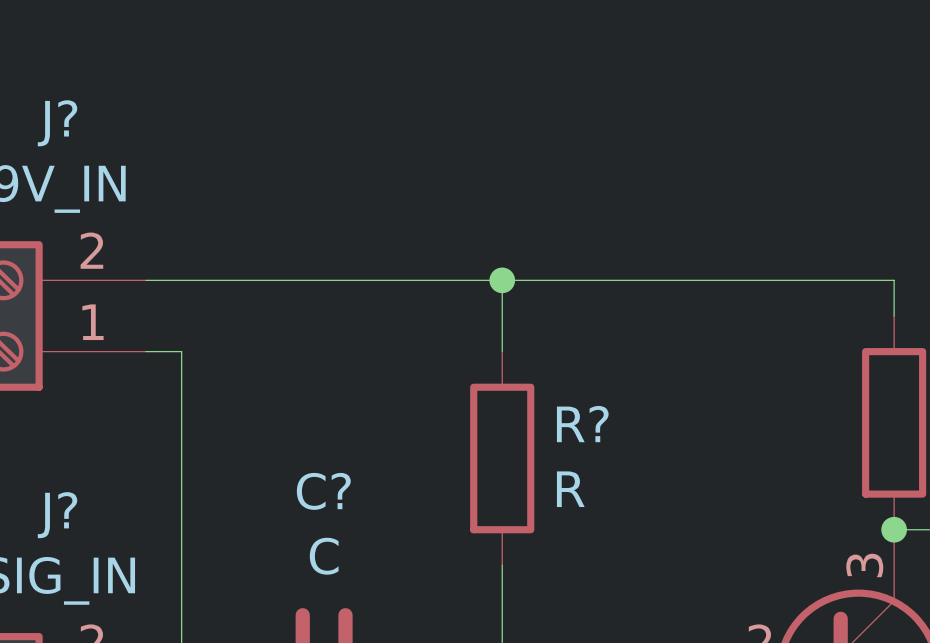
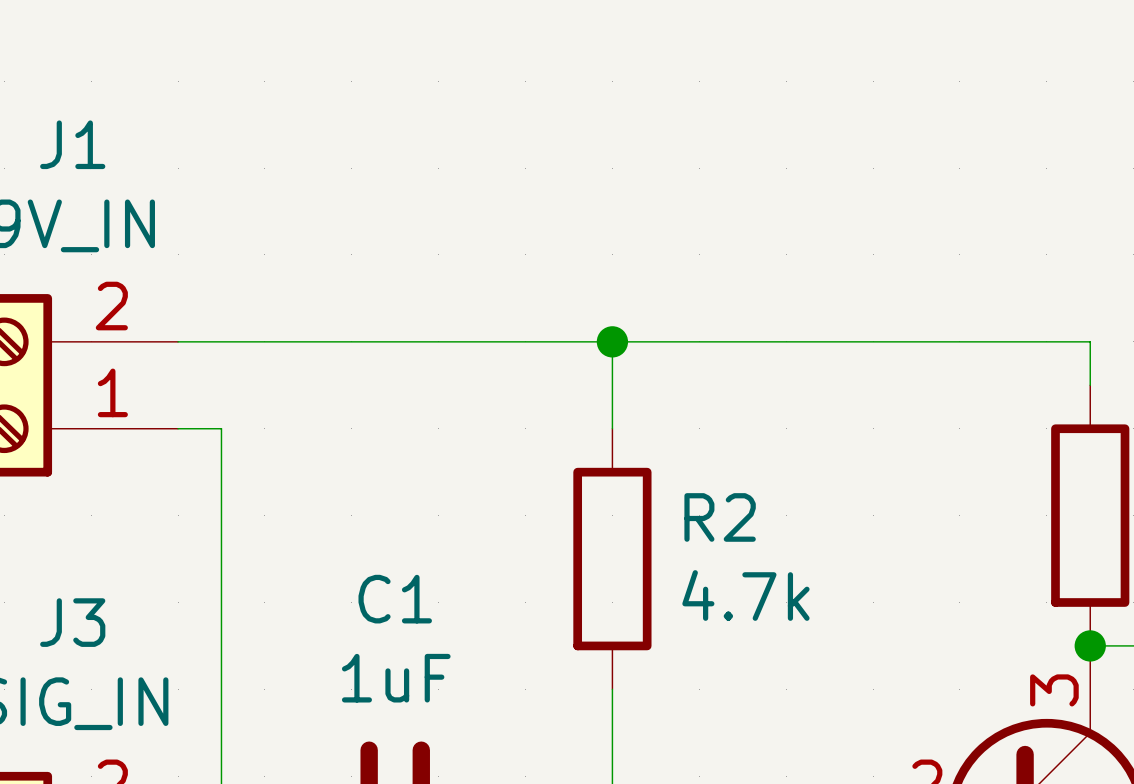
J? name: J? (57, 123) -> J1 (72, 144)
R? name: R? (582, 424) -> R2 (720, 517)
R? value: R (570, 489) -> 4.7k (745, 595)
C? name: C? (323, 491) -> C1 (395, 599)
J? name: J? (57, 515) -> J3 (72, 622)
C? value: C (324, 556) -> 1uF (396, 678)

